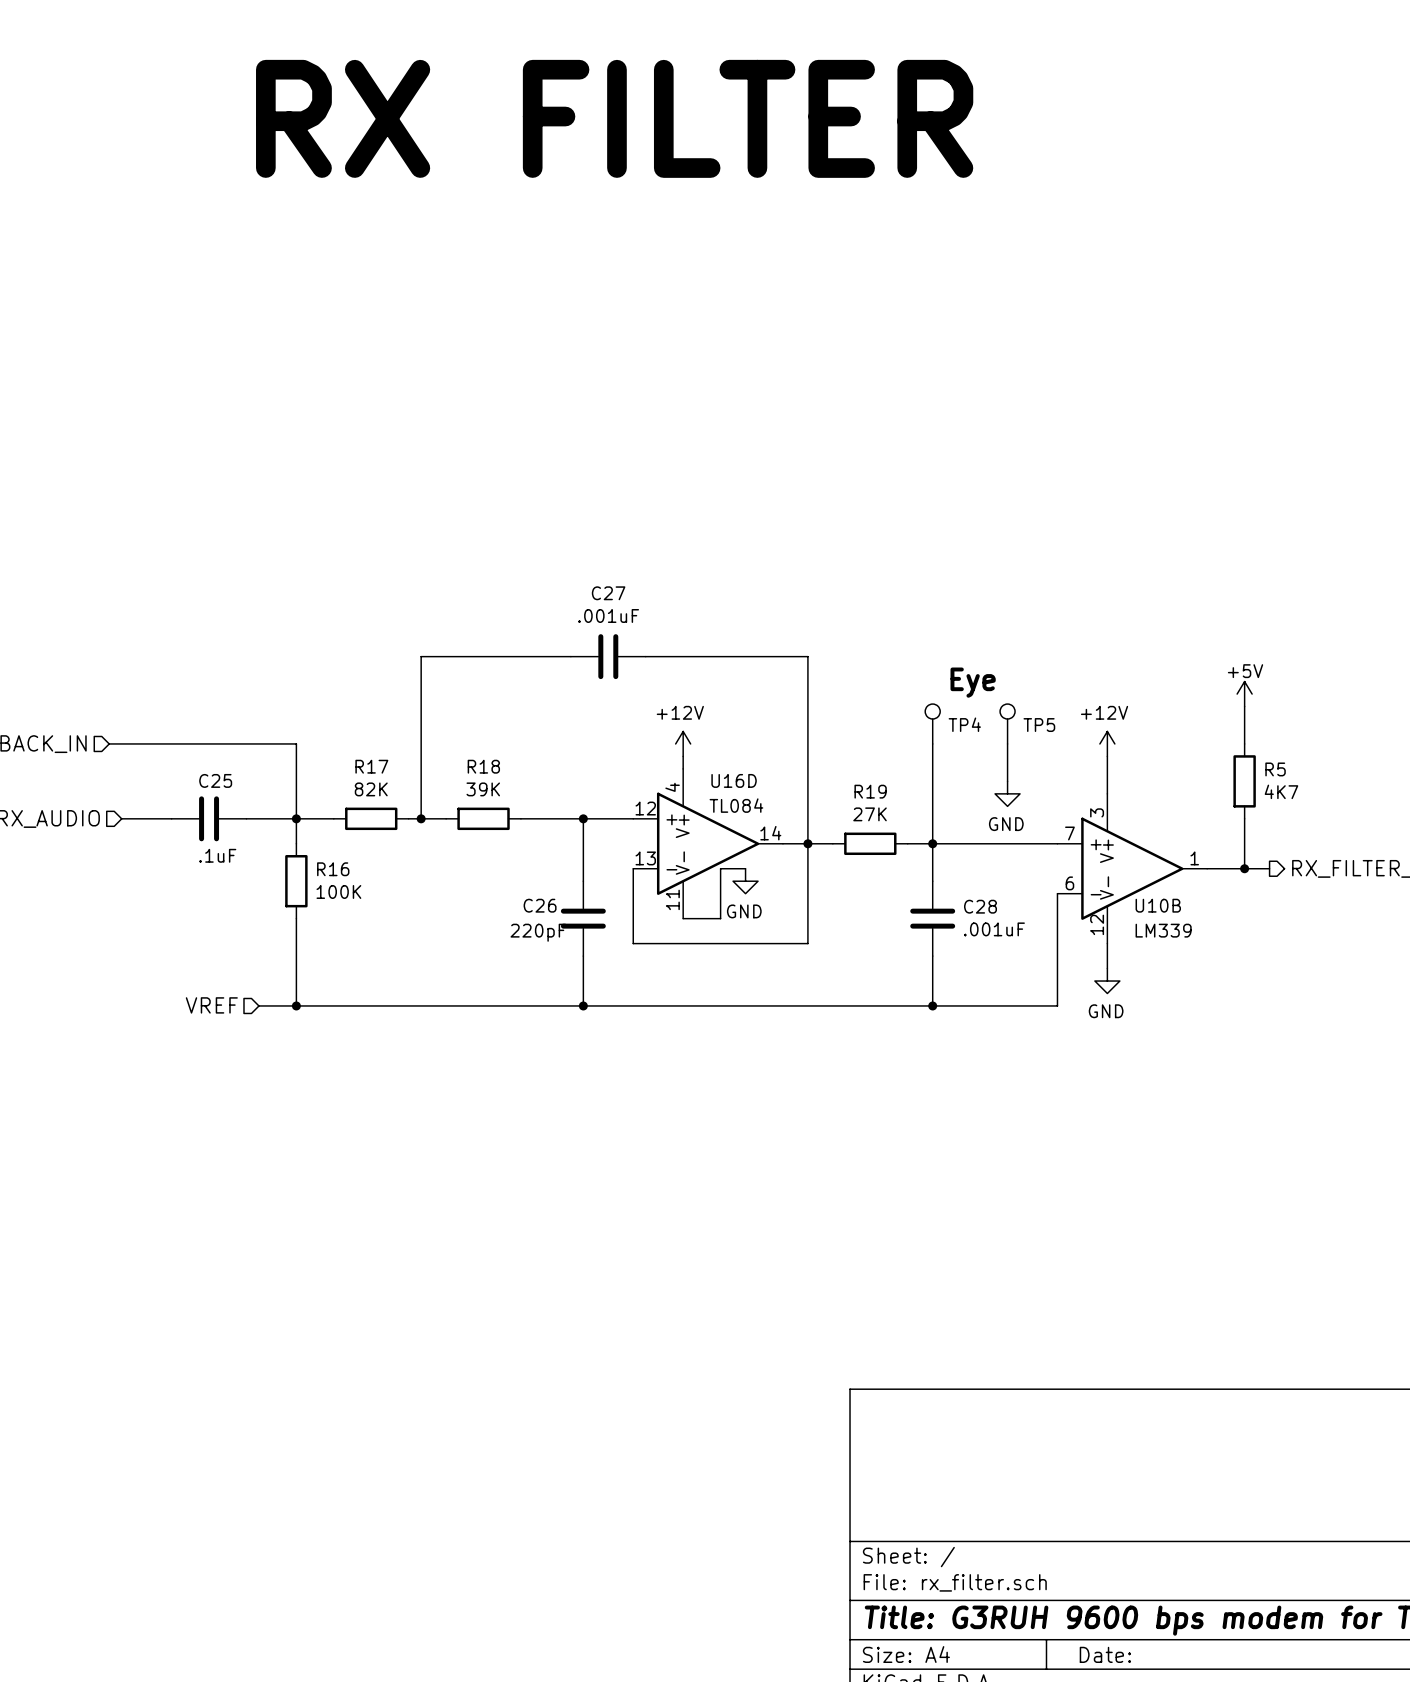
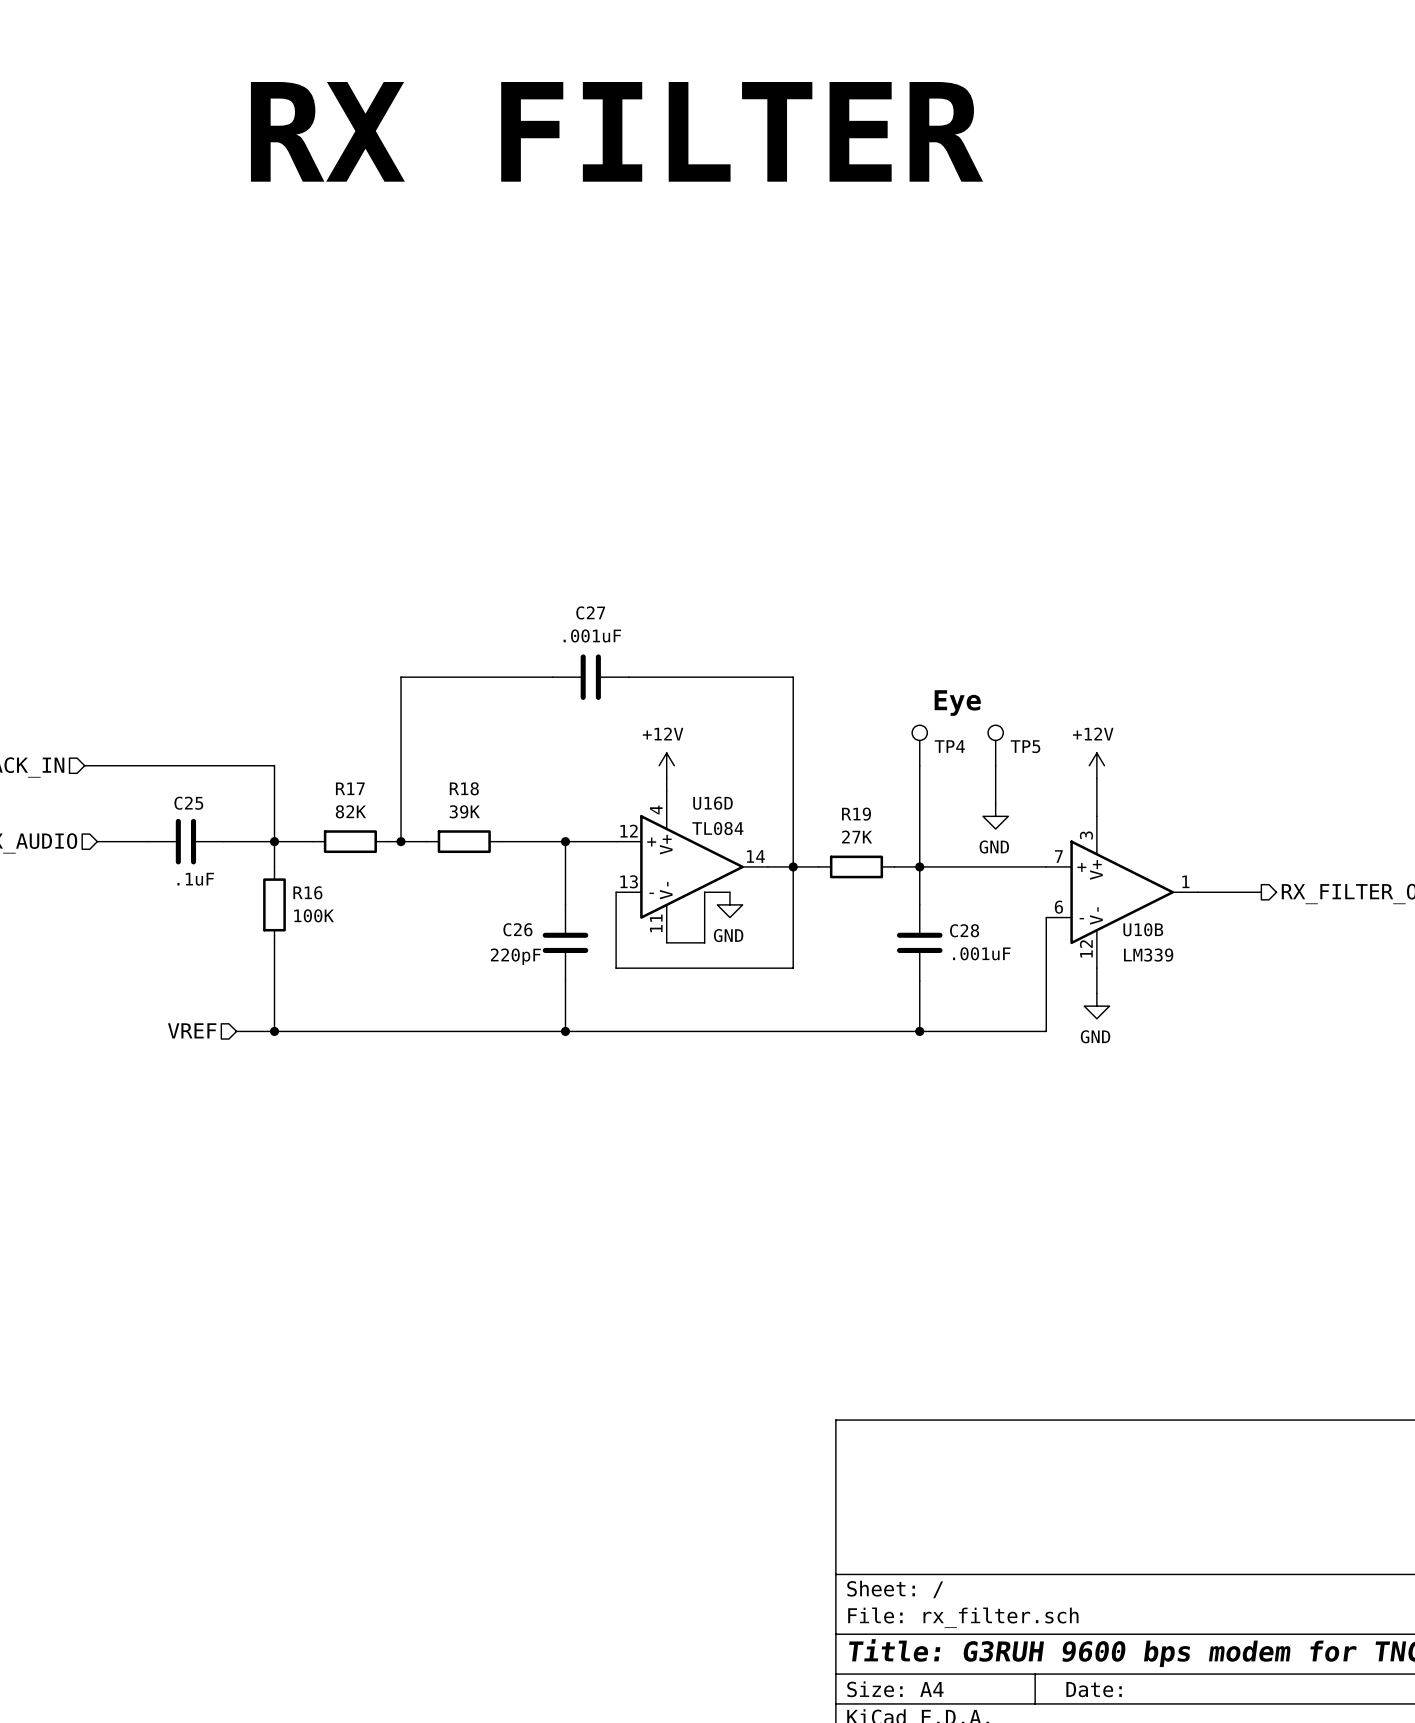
power symbol: +5V (1244, 694) -> none
wire: (1244, 706) (1244, 743) -> none
R5: 4K7 (1244, 781) -> none
wire: (1244, 818) (1244, 868) -> none
junction: (1244, 868) -> none

